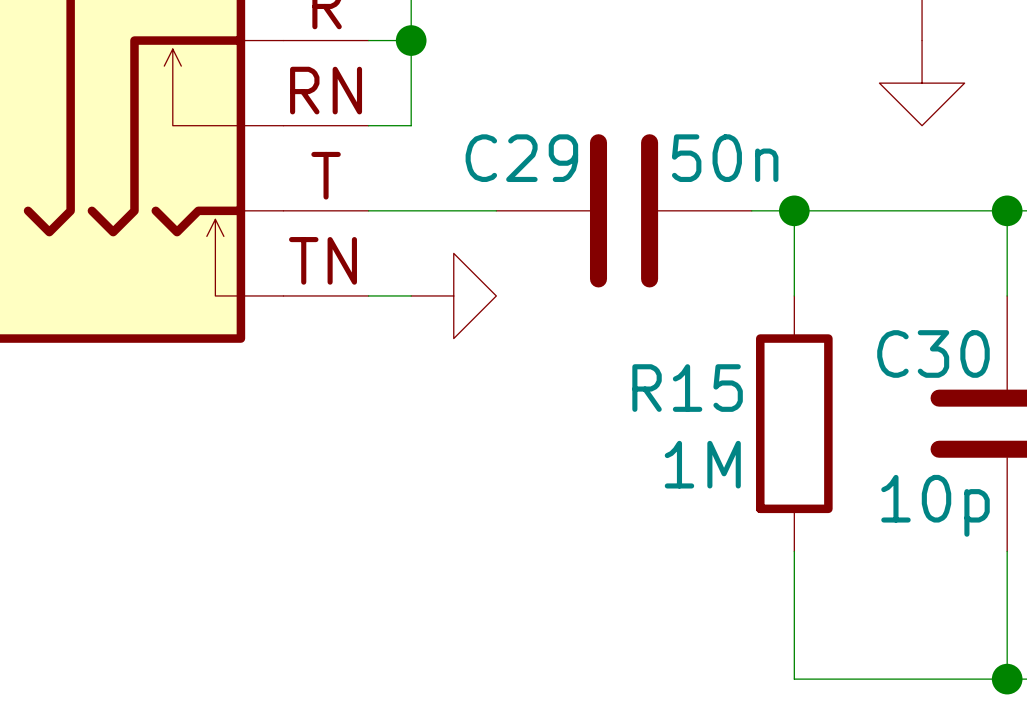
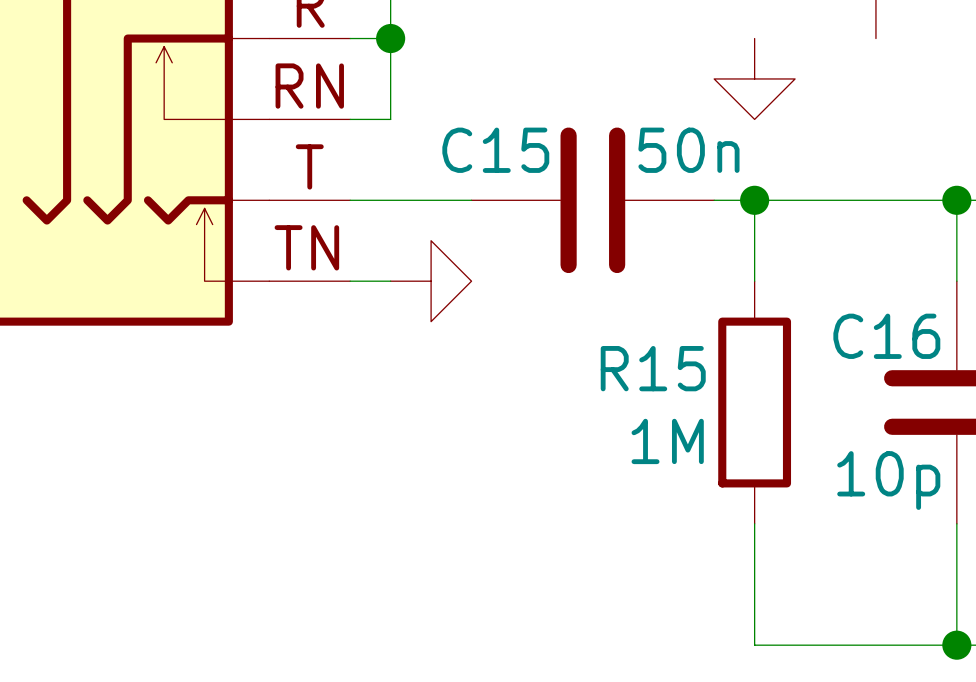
power symbol position: (922, 83) -> (754, 78)
C29 name: C29 (521, 158) -> C15 (495, 150)
C30 name: C30 (933, 353) -> C16 (886, 336)

